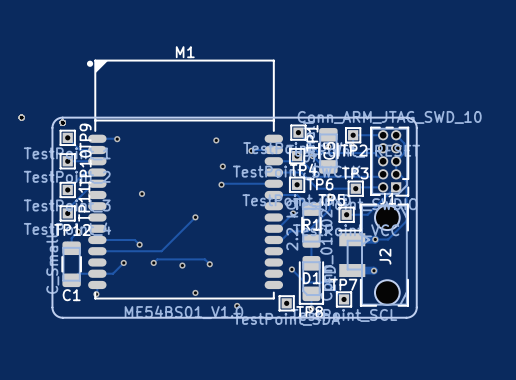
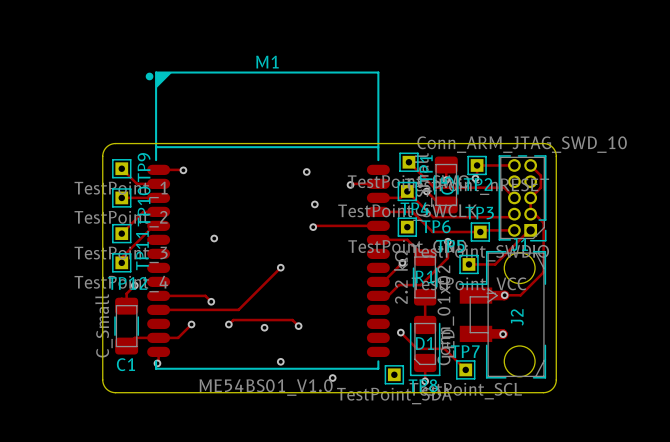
via: (21, 117) -> none
via: (62, 122) -> none

